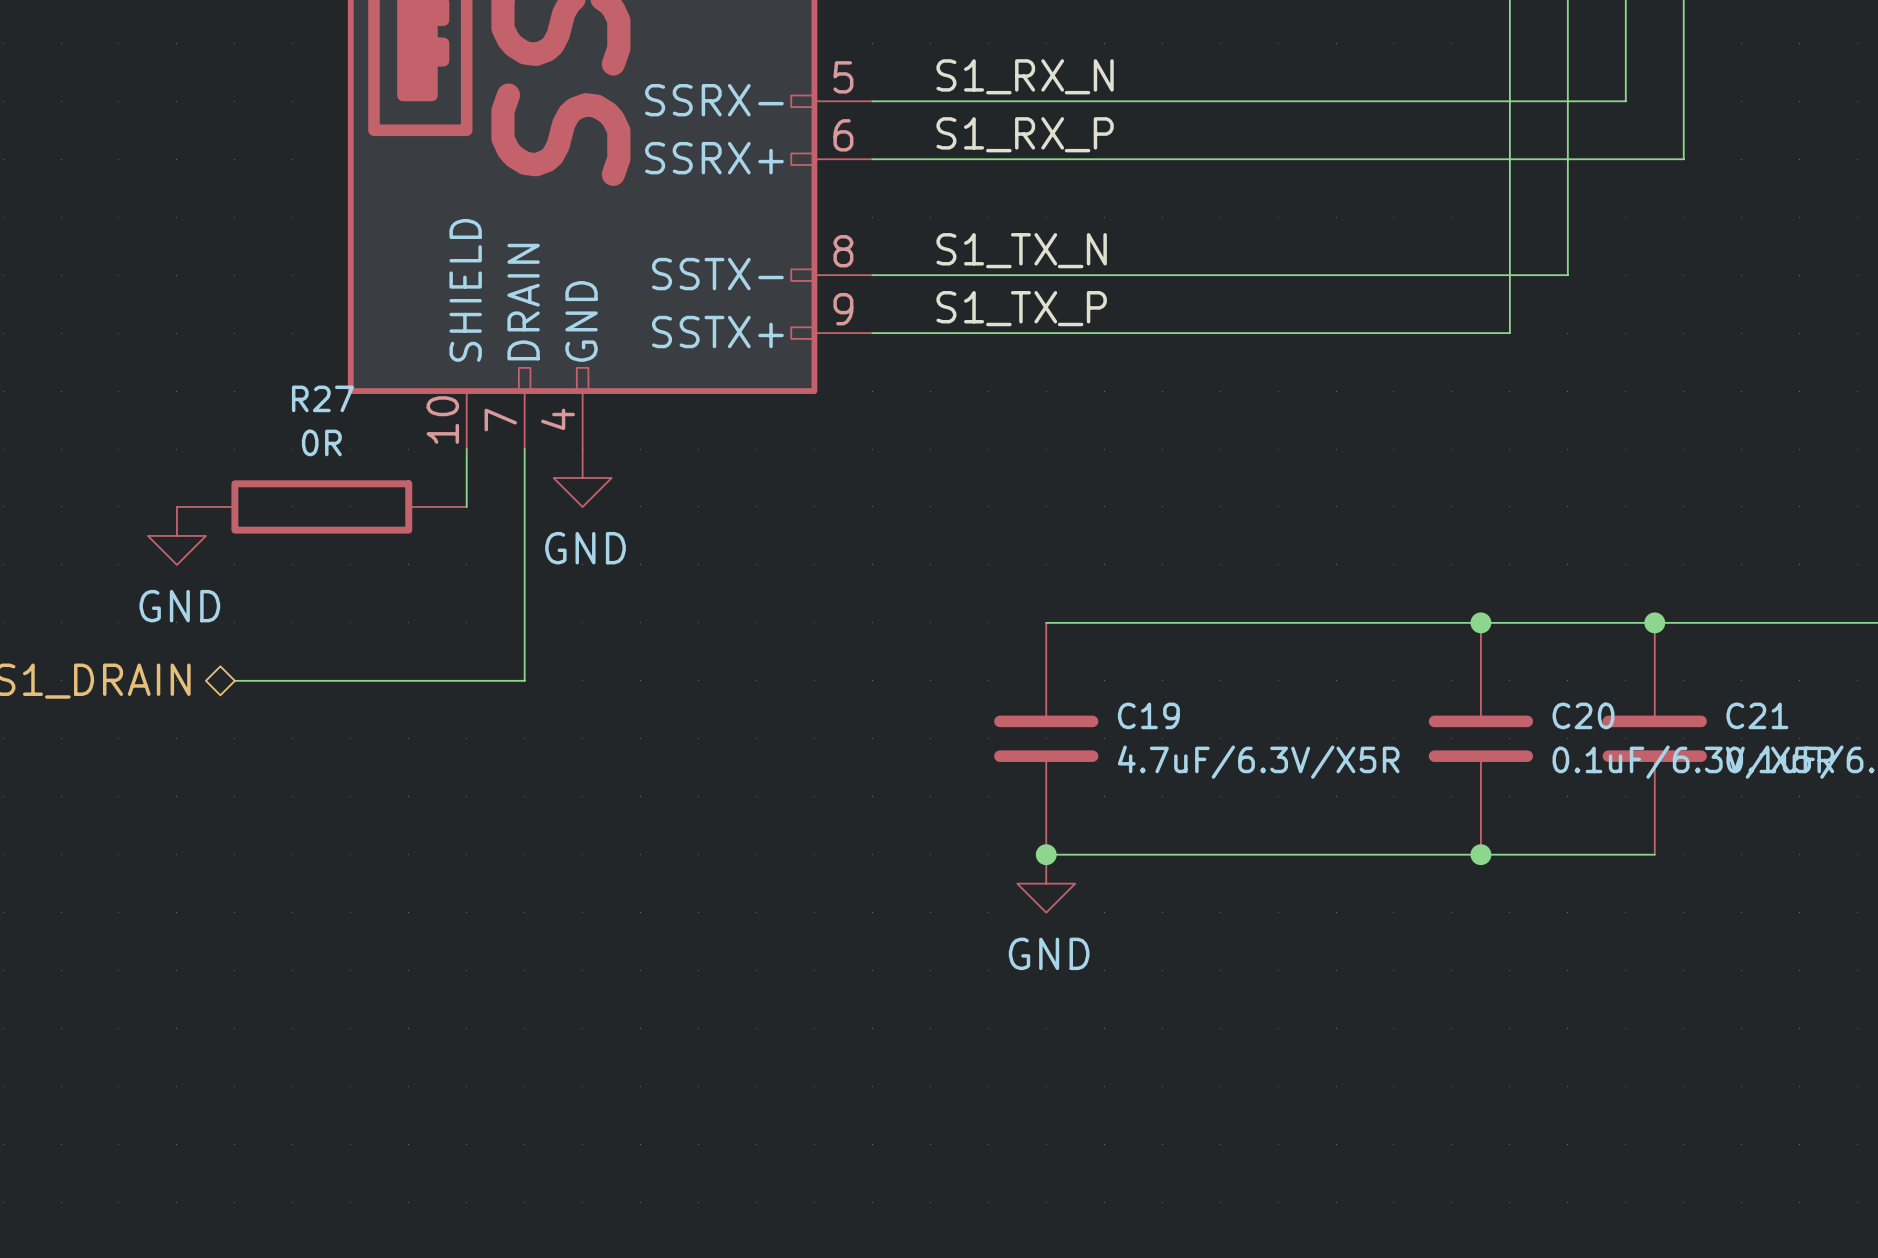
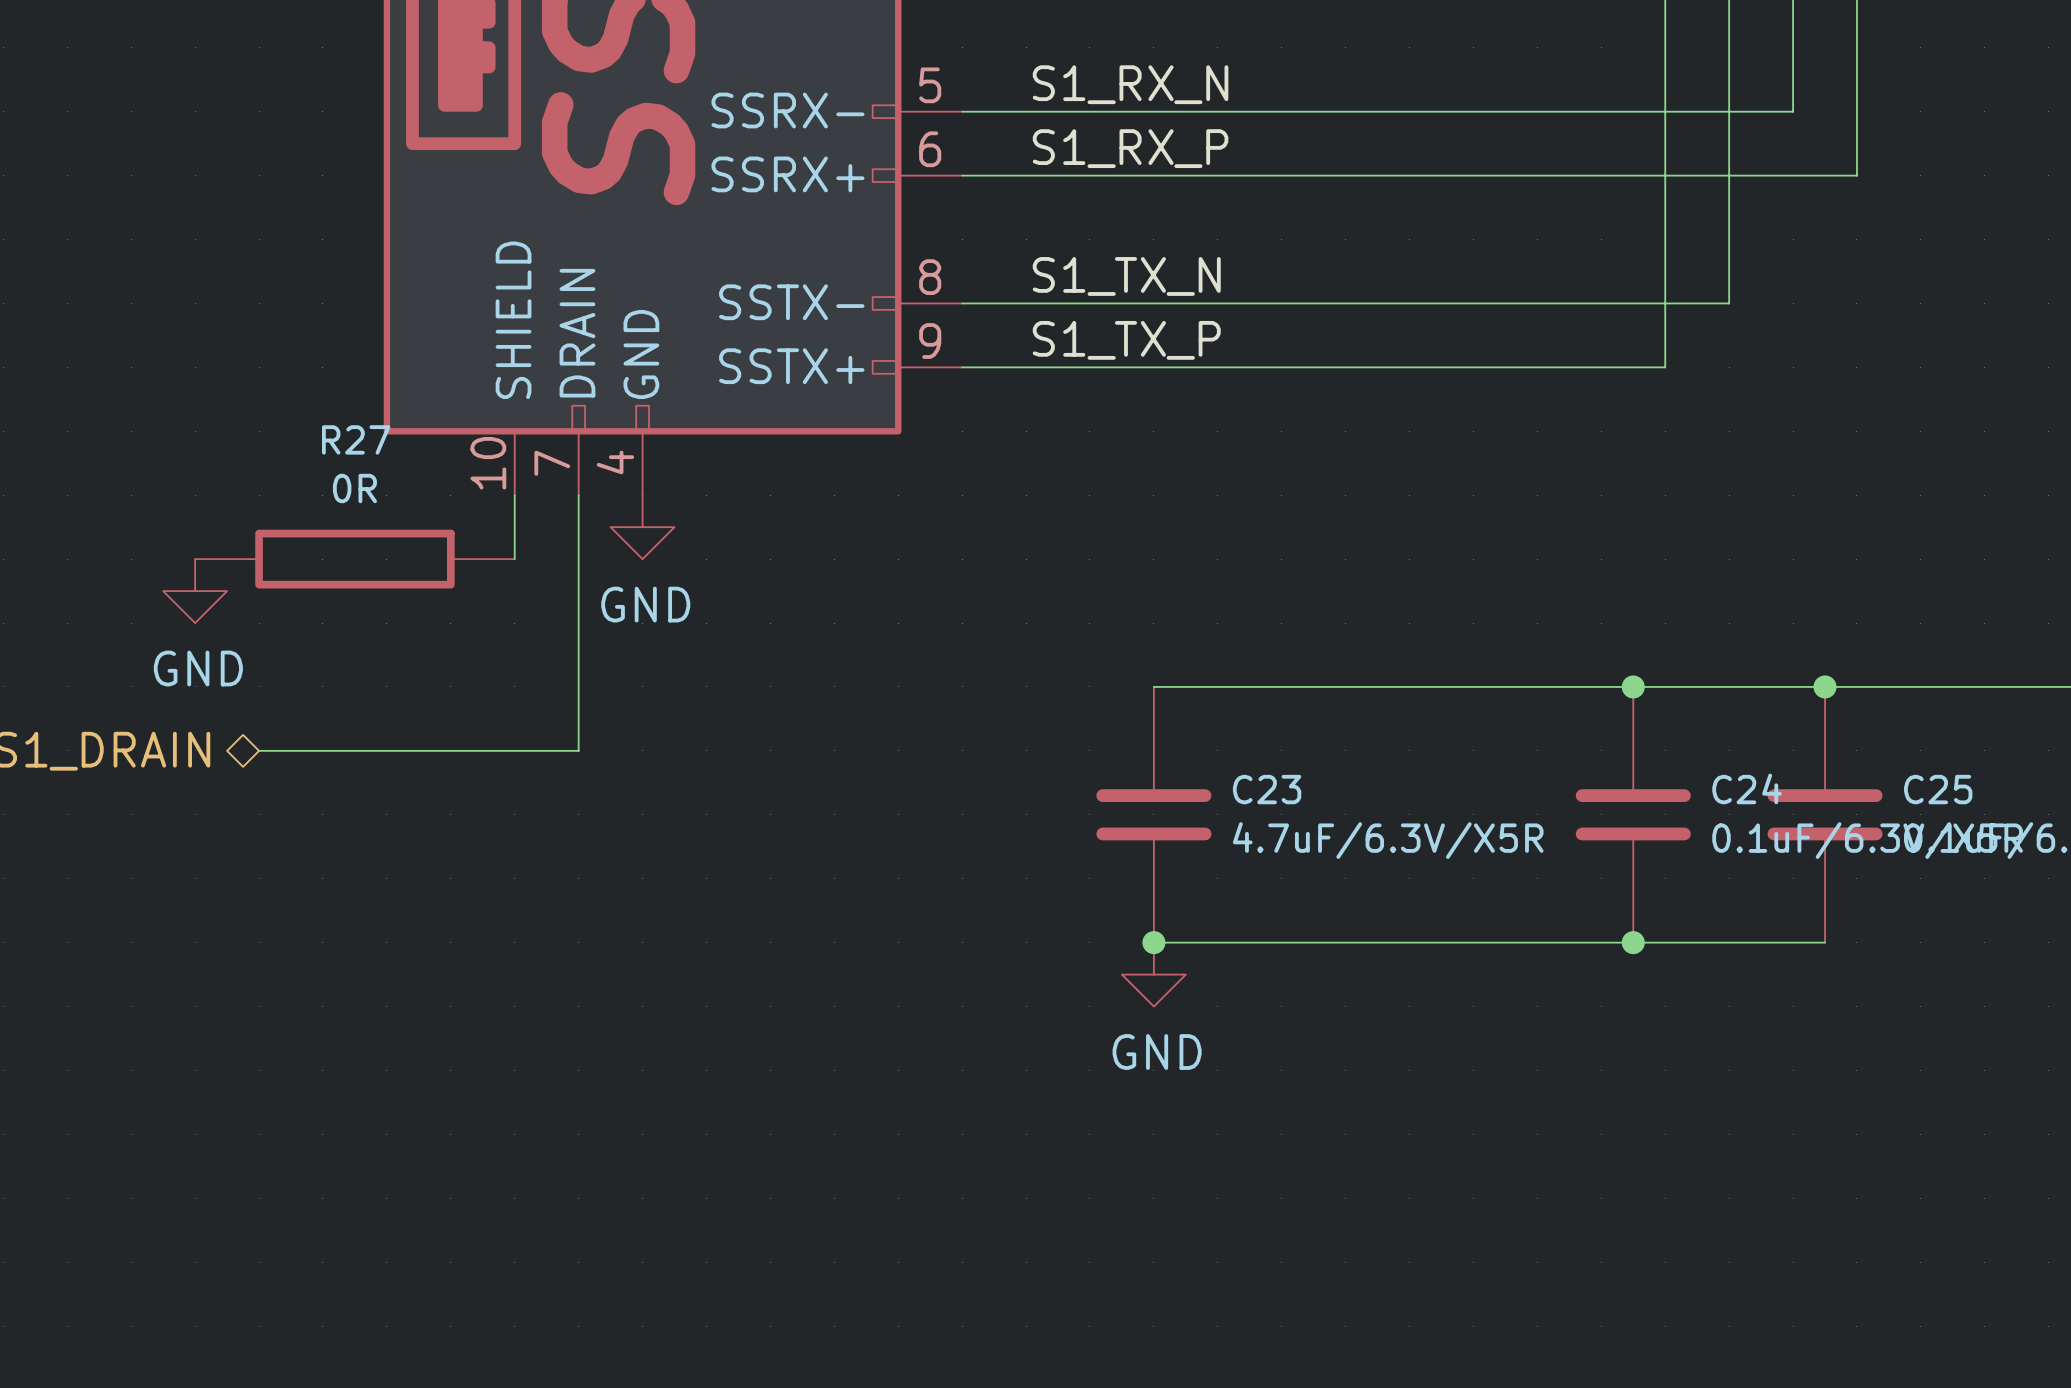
C19 name: C19 (1148, 715) -> C23 (1267, 789)
C20 name: C20 (1583, 715) -> C24 (1747, 788)
C21 name: C21 (1757, 715) -> C25 (1938, 789)

